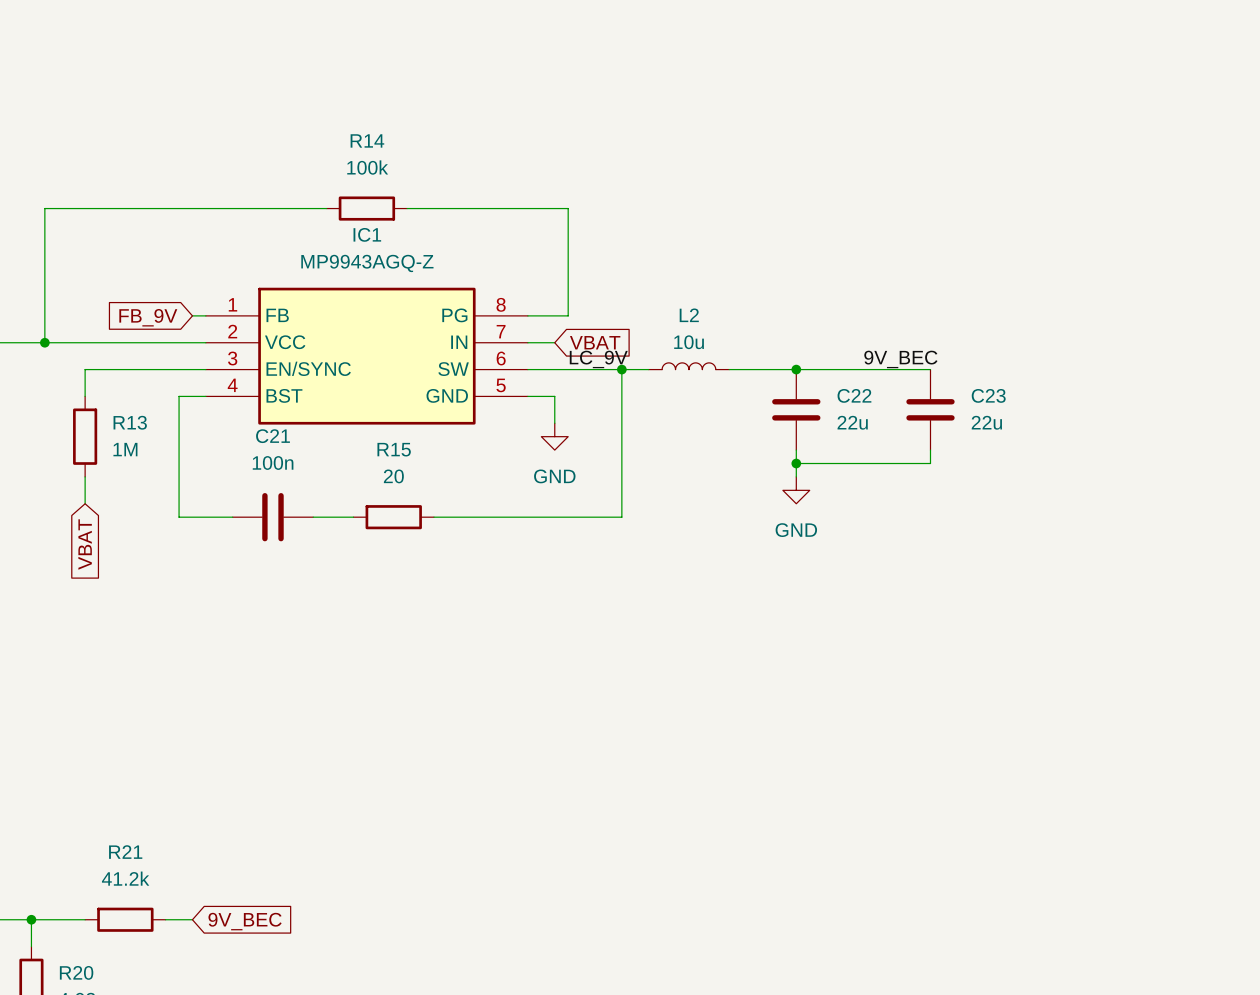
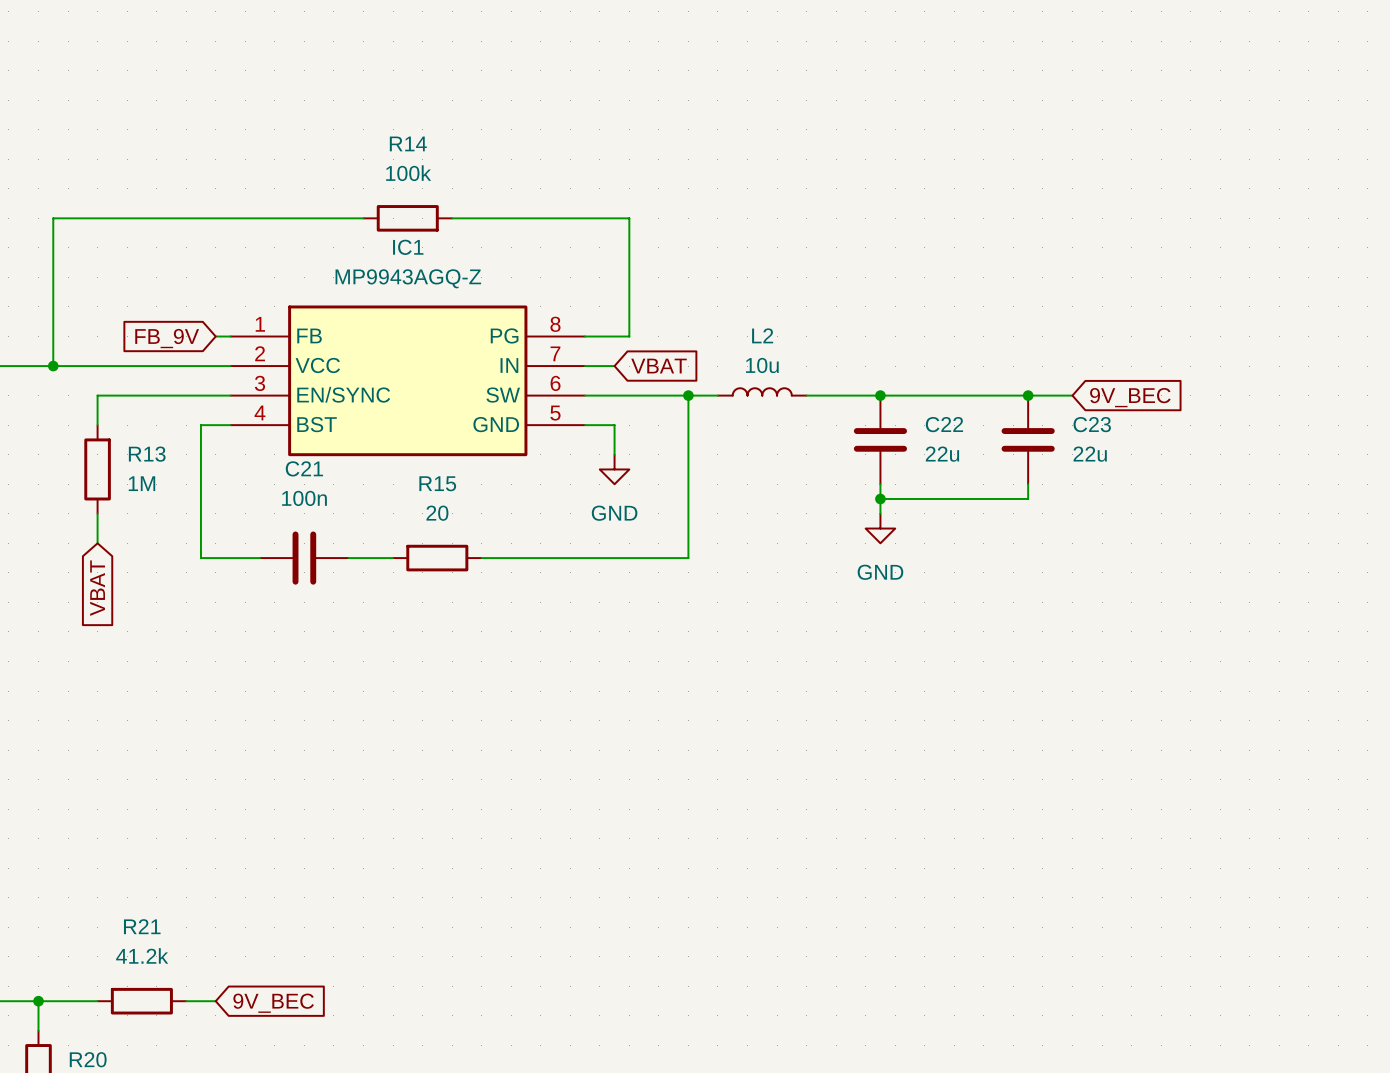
label: LC_9V (598, 359) -> none
label: 9V_BEC (900, 359) -> none
wire: none -> (1028, 395) (1072, 395)
junction: none -> (1028, 395)
global label: none -> 9V_BEC (1130, 397)

